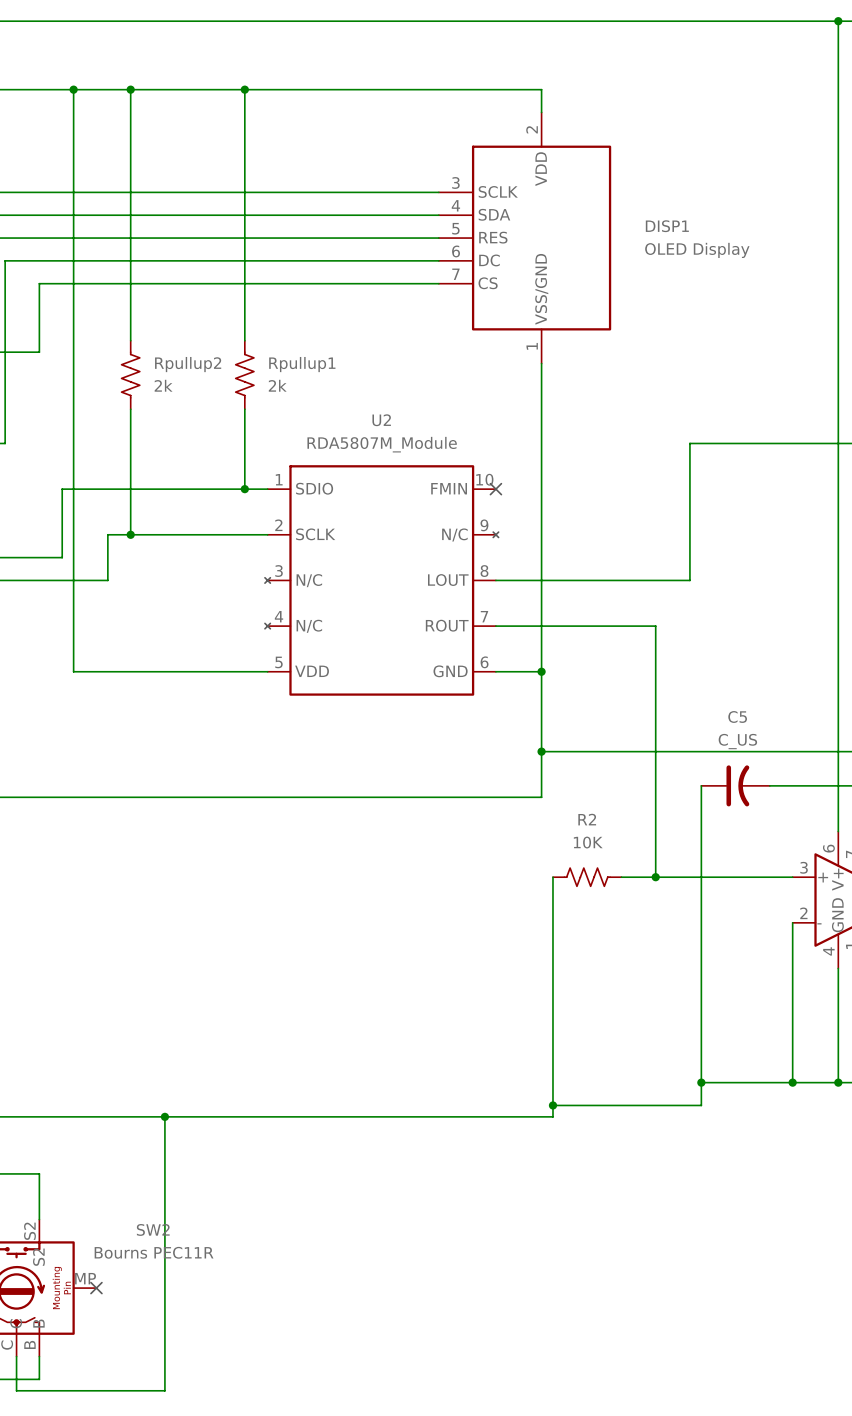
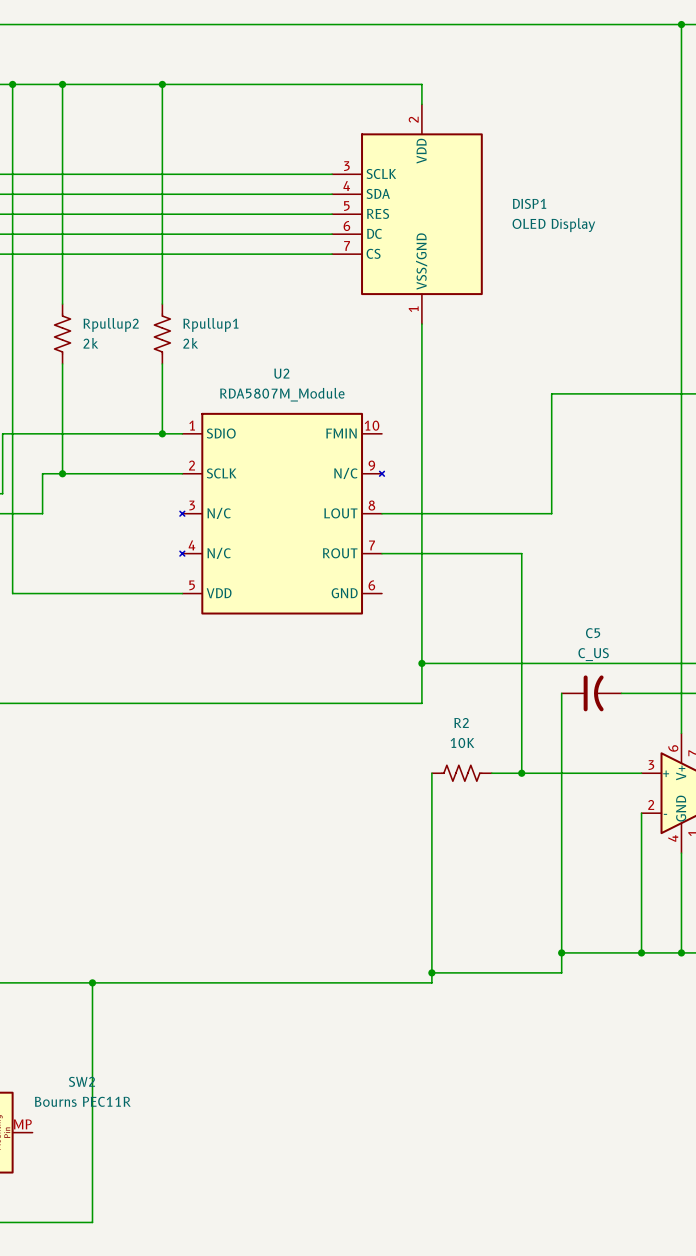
no-connect mark: (495, 489) -> none
wire: (495, 671) (541, 671) -> none
junction: (541, 671) -> none
no-connect mark: (96, 1288) -> none

